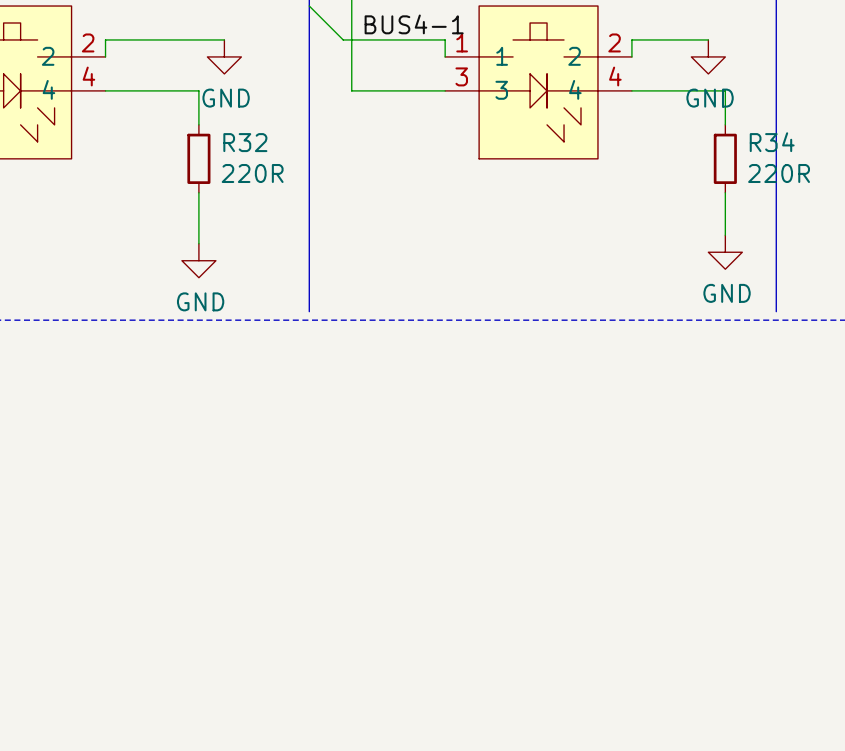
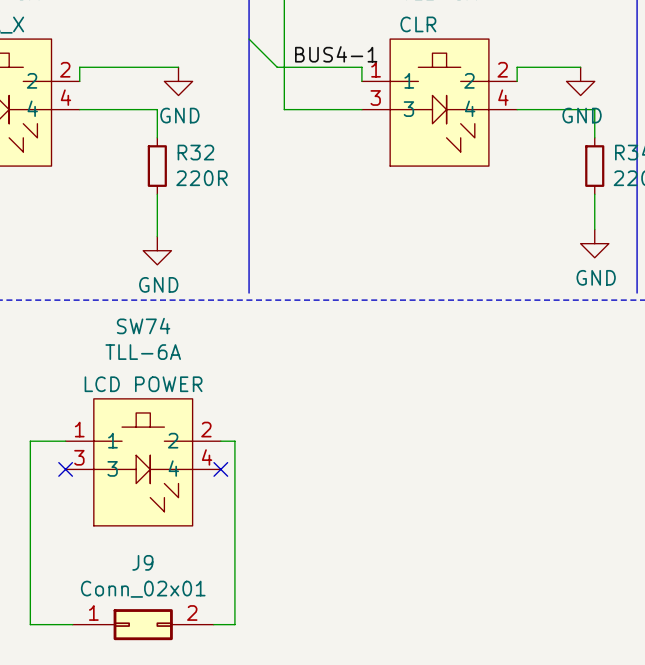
wire: none -> (65, 441) (30, 441) (30, 624) (72, 624)
wire: none -> (220, 441) (234, 441) (234, 624) (213, 624)
SW74: none -> TLL-6A (143, 462)
no-connect mark: none -> (65, 469)
no-connect mark: none -> (220, 469)
J9: none -> Conn_02x01 (143, 624)

